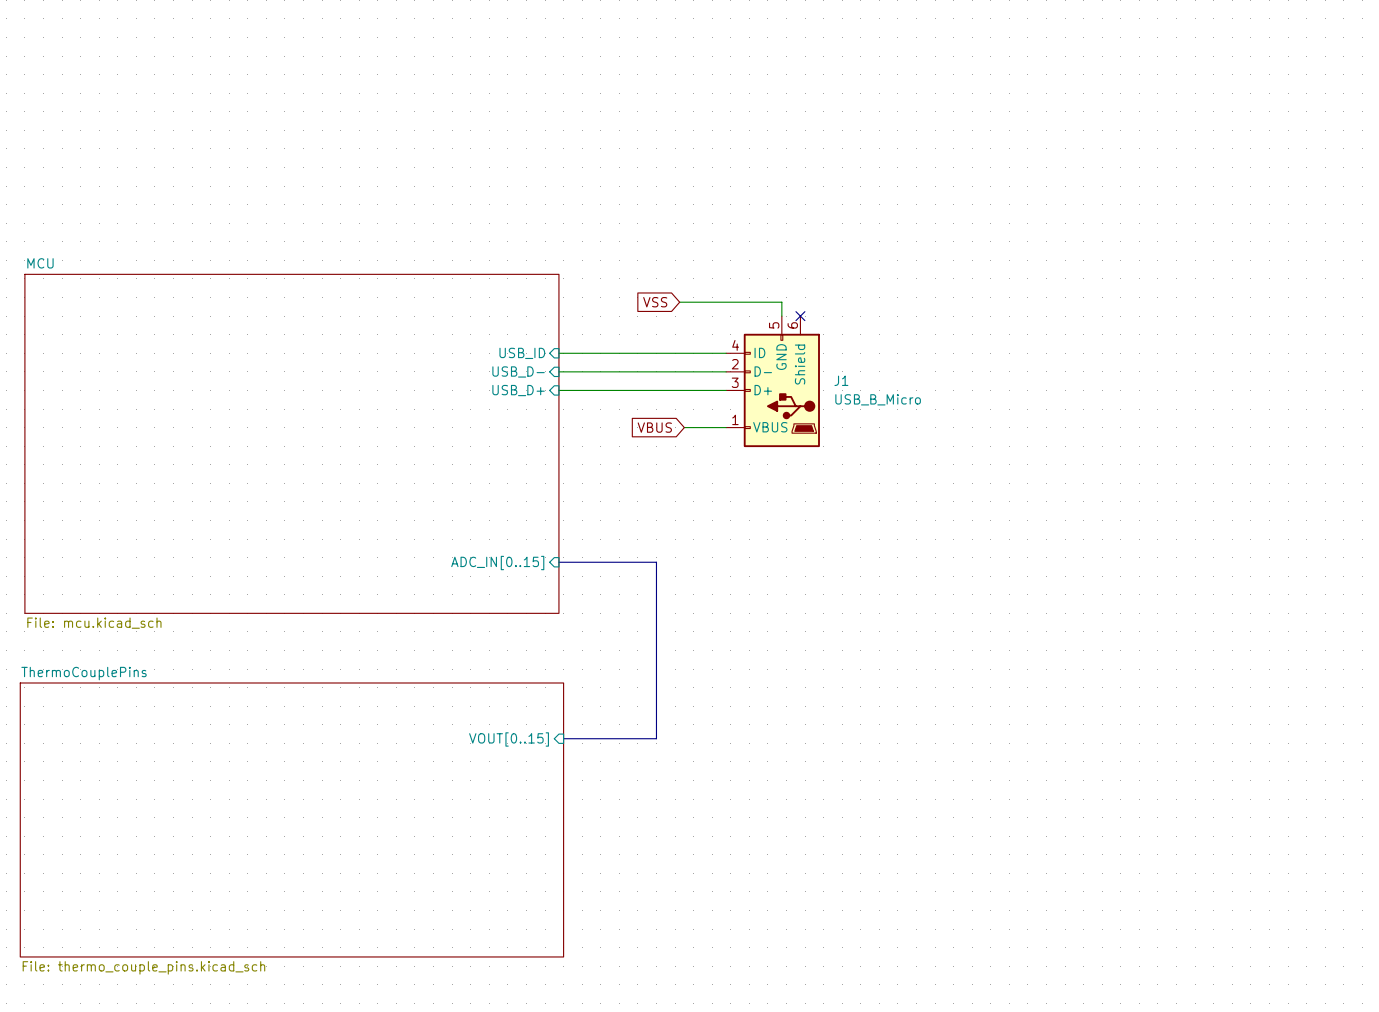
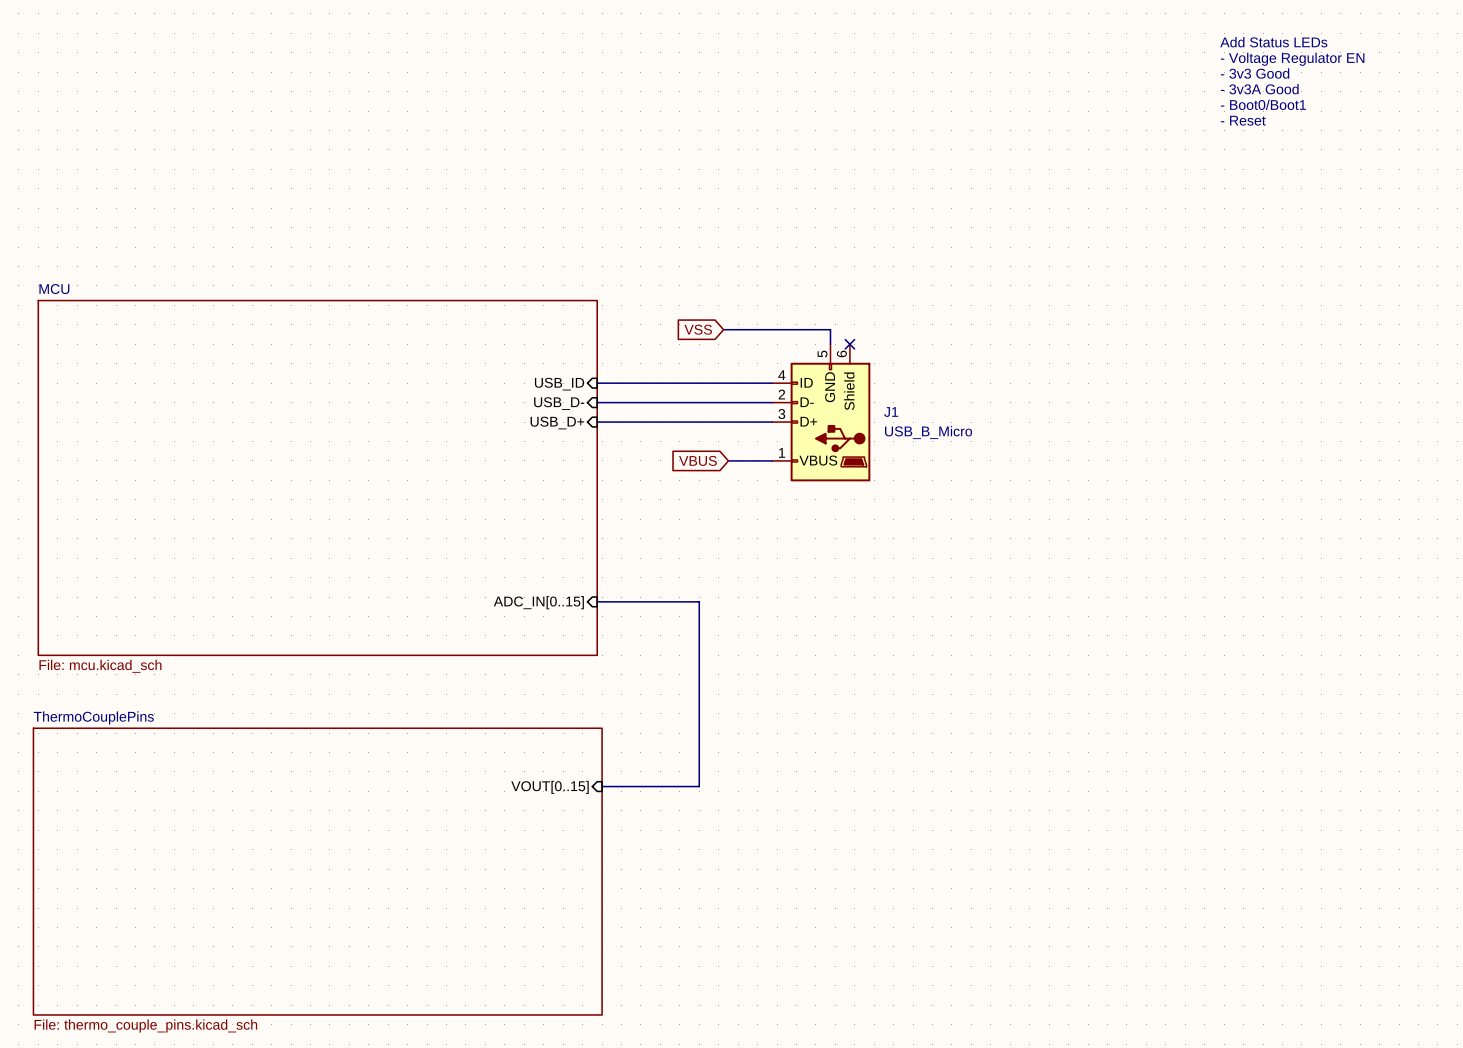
text: none -> Add Status LEDs (1273, 42)
text: none -> - Voltage Regulator EN (1292, 59)
text: none -> - 3v3 Good (1255, 73)
text: none -> - 3v3A Good (1259, 89)
text: none -> - Boot0/Boot1 (1263, 104)
text: none -> - Reset (1243, 120)

